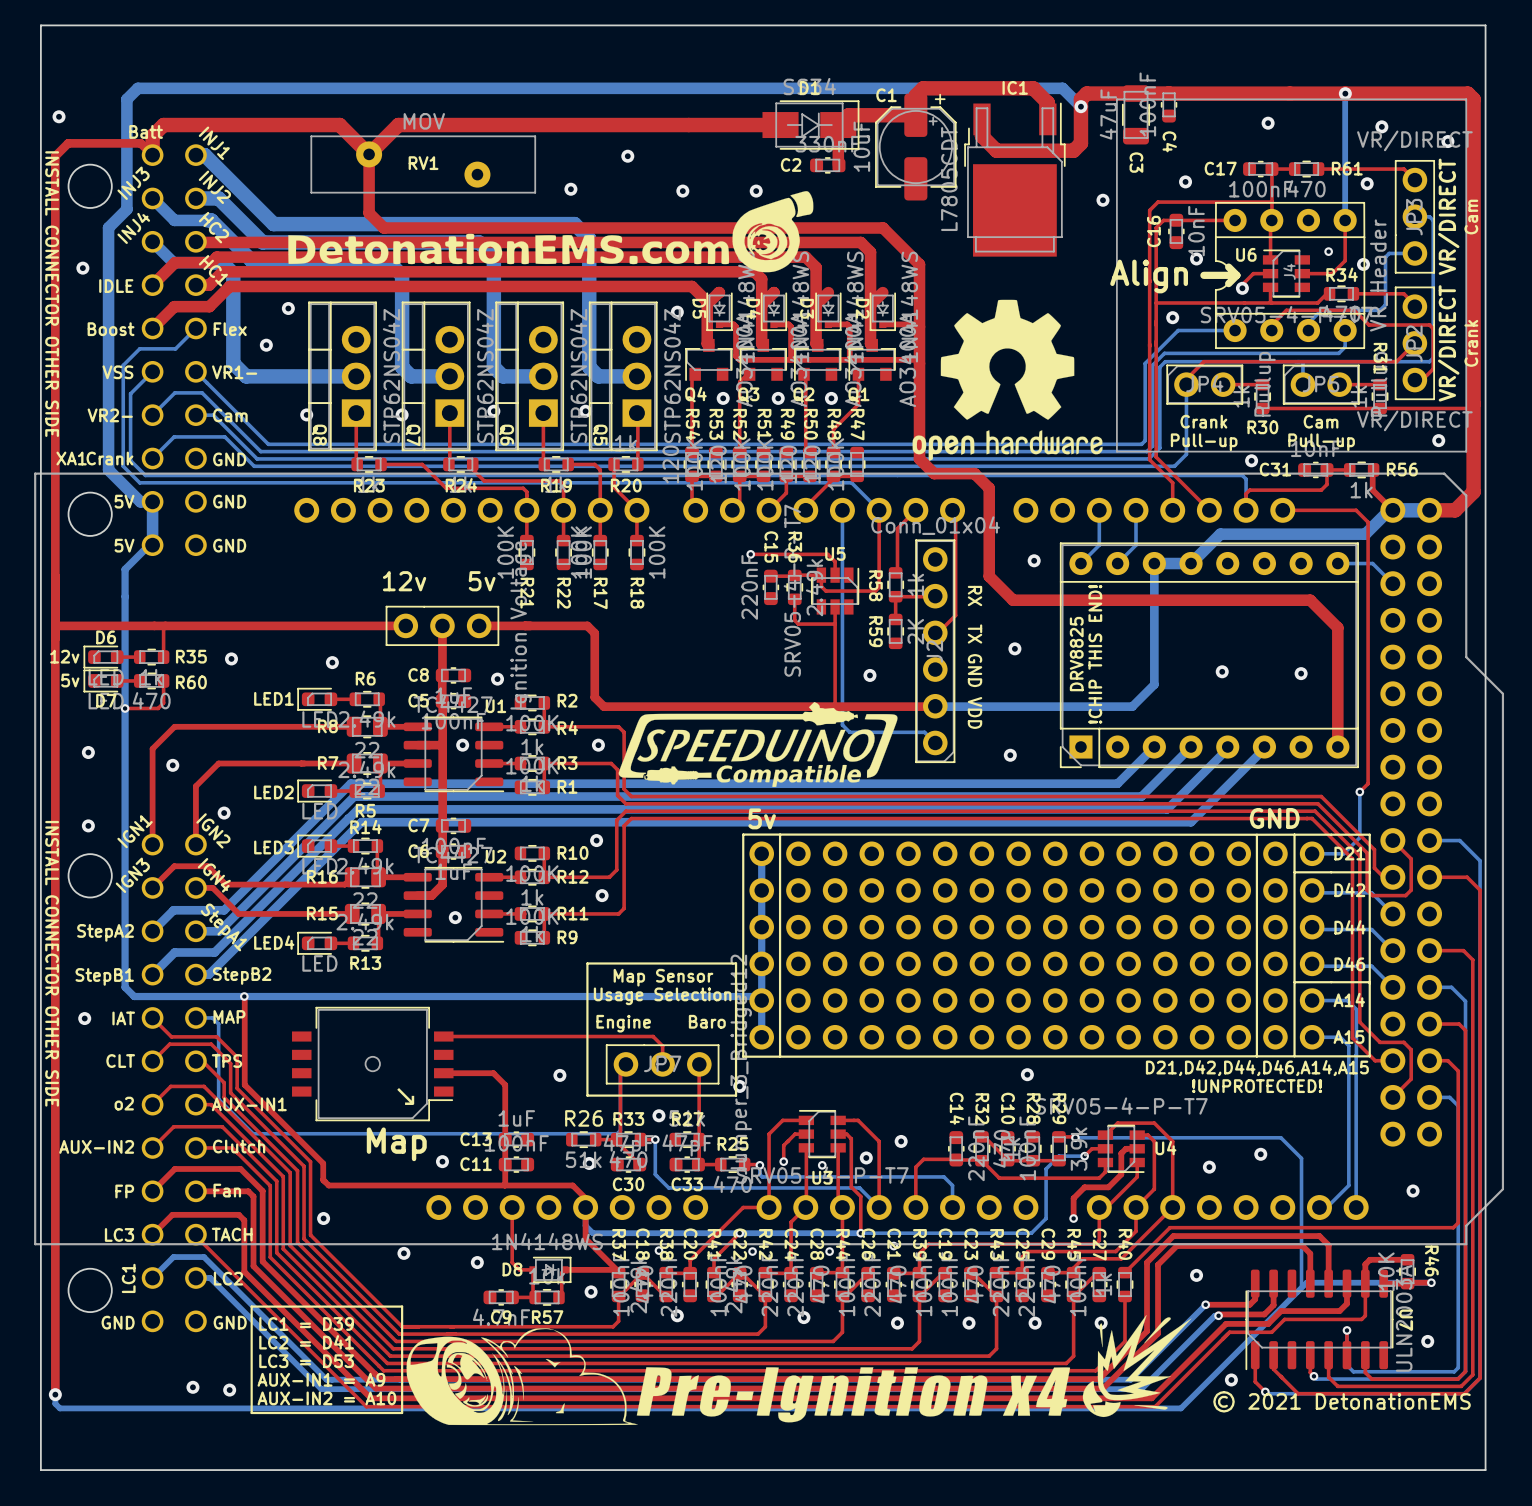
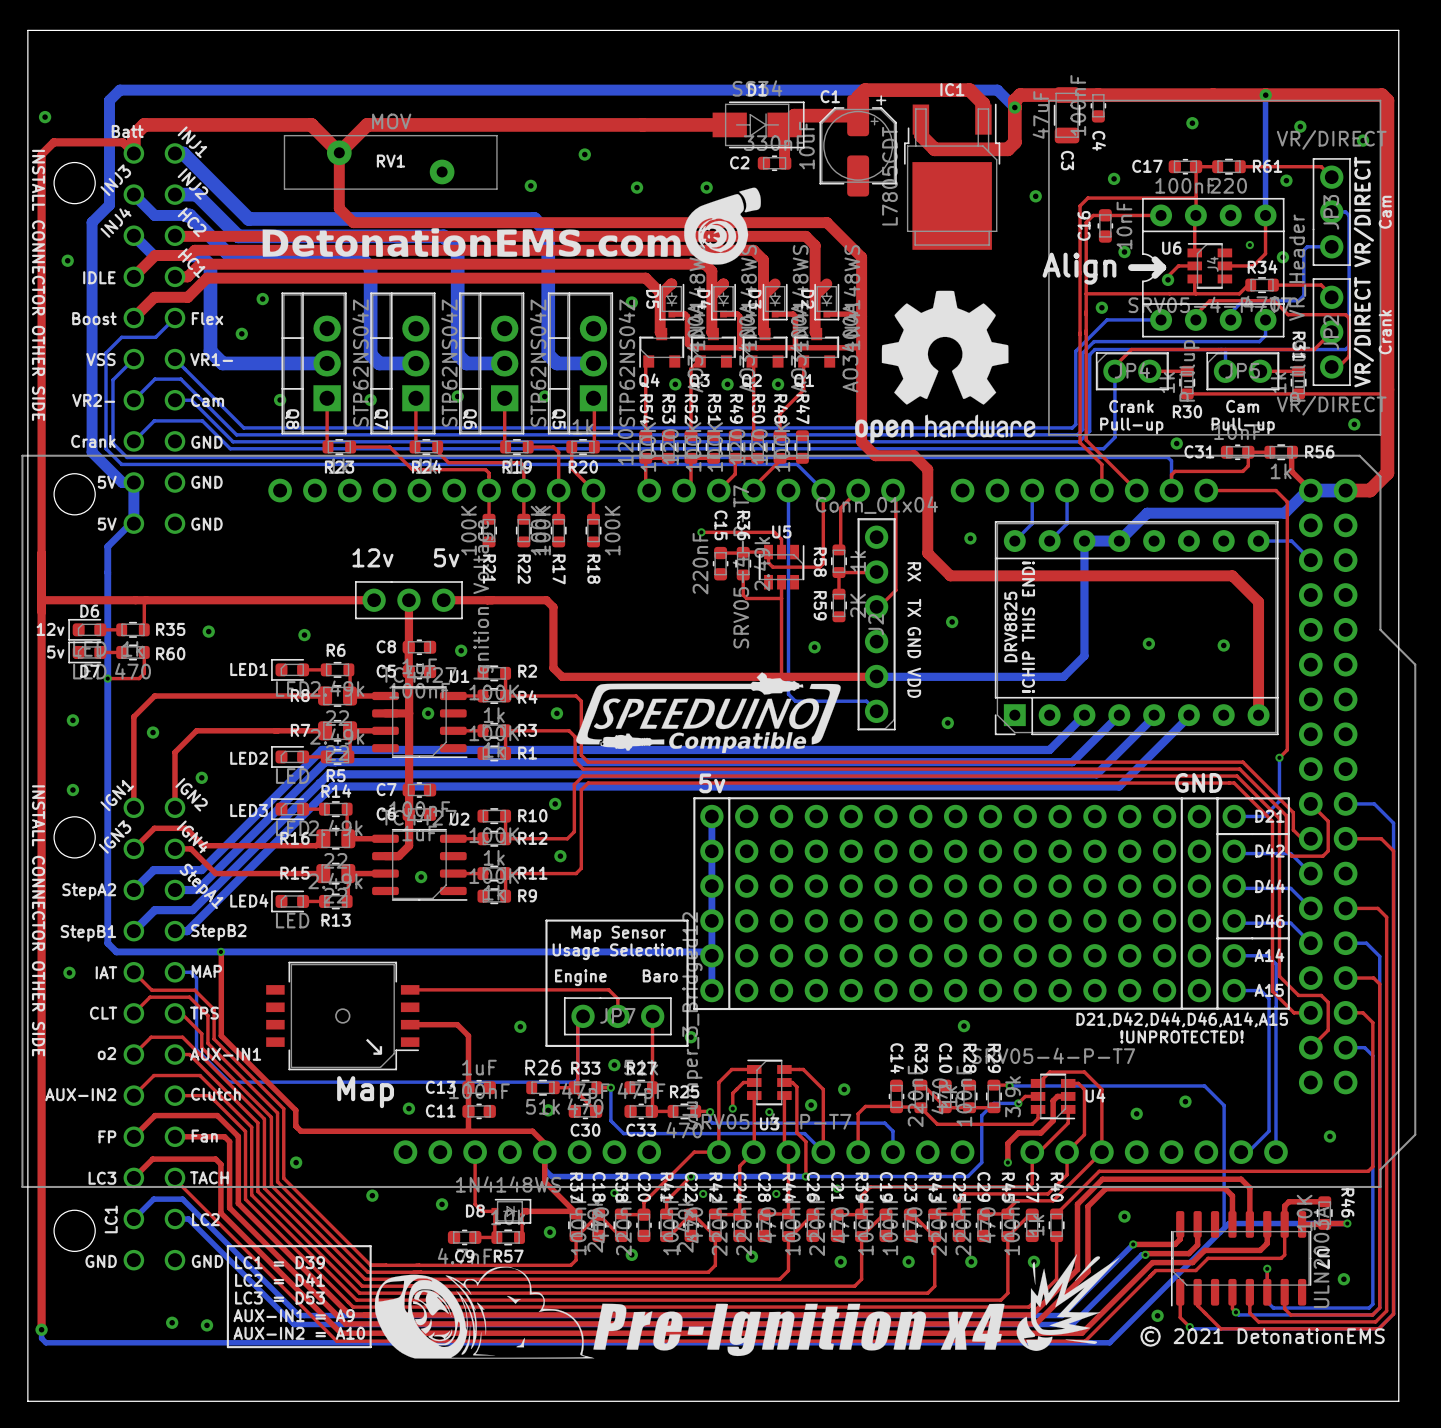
R61 value: 470 (1306, 188) -> 220 (1228, 185)
XA1 name: XA1 (71, 458) -> none

